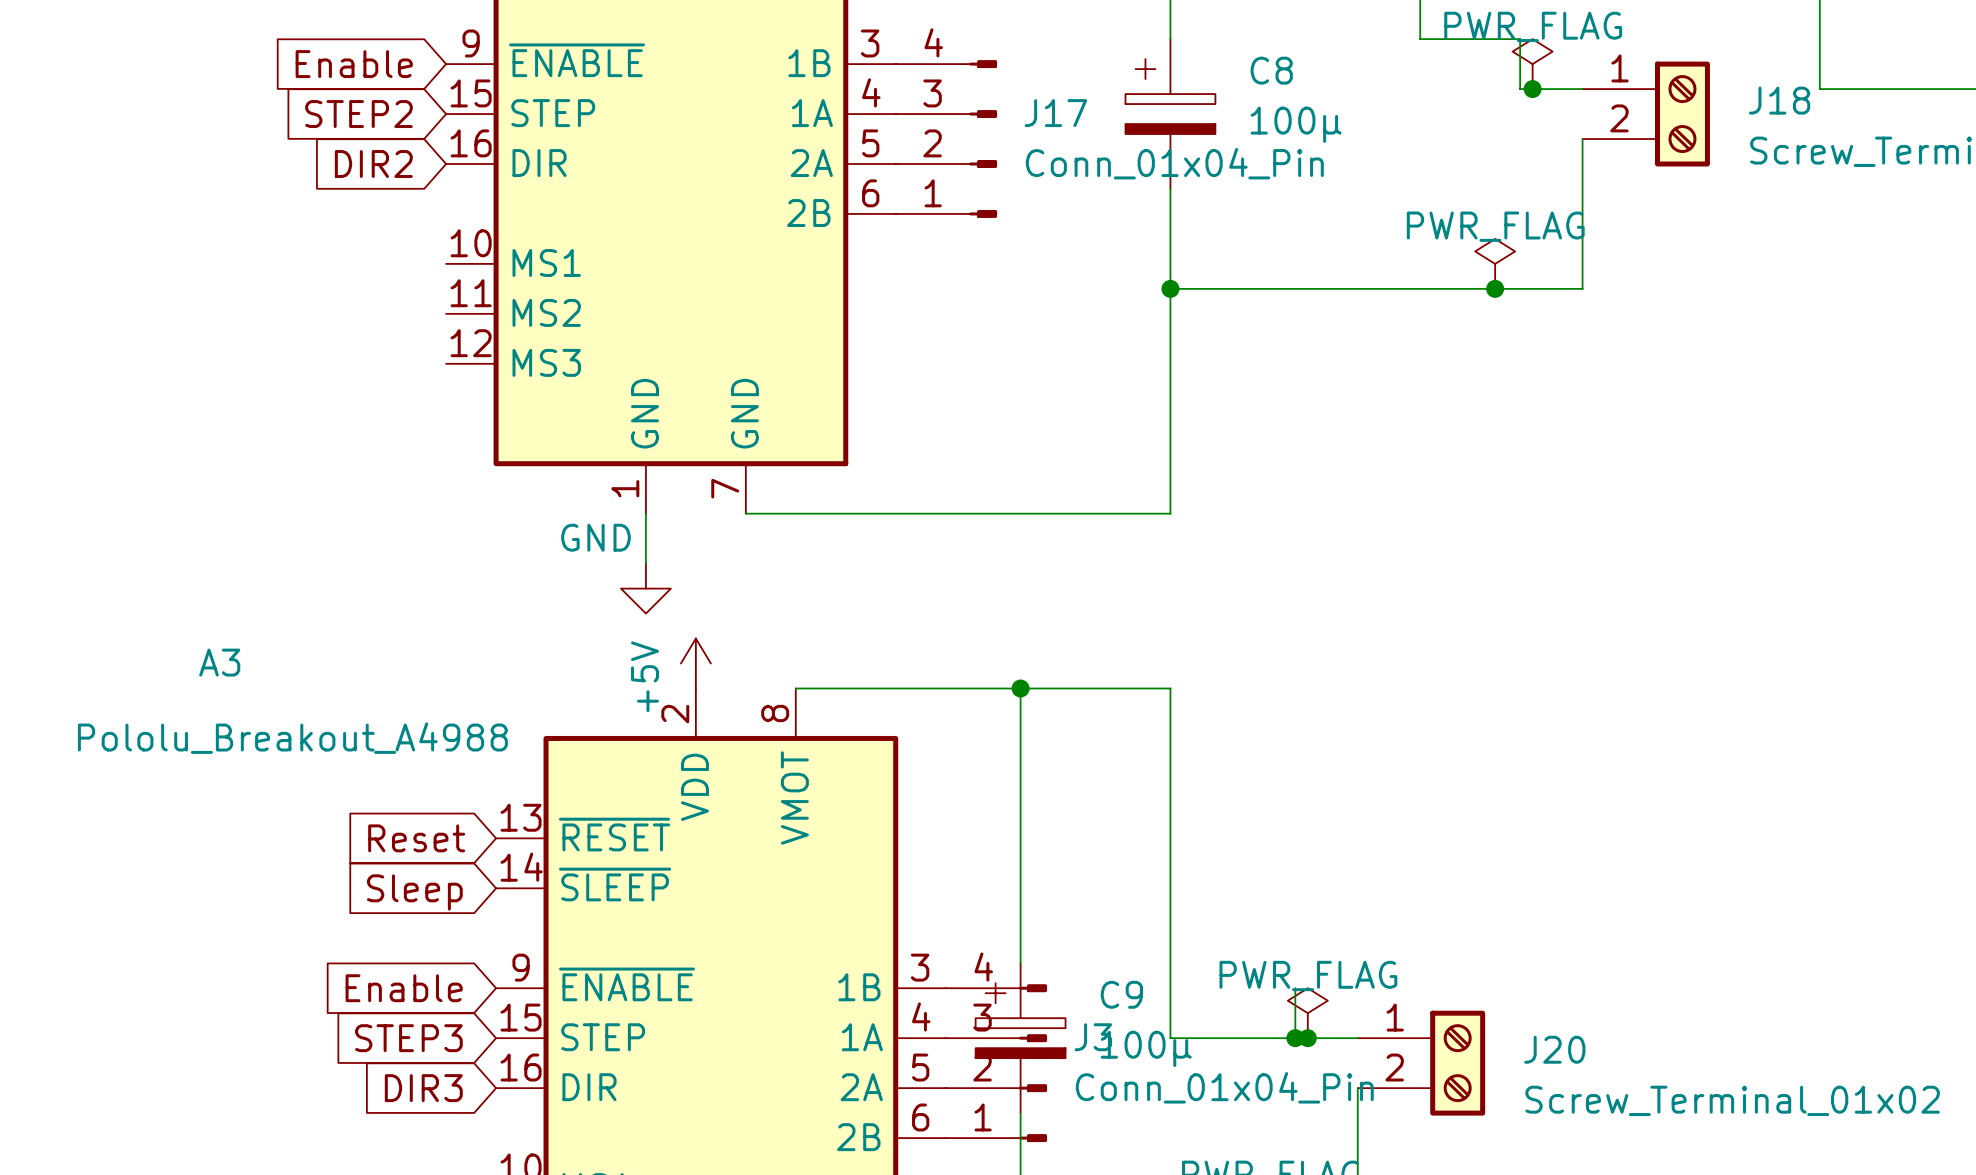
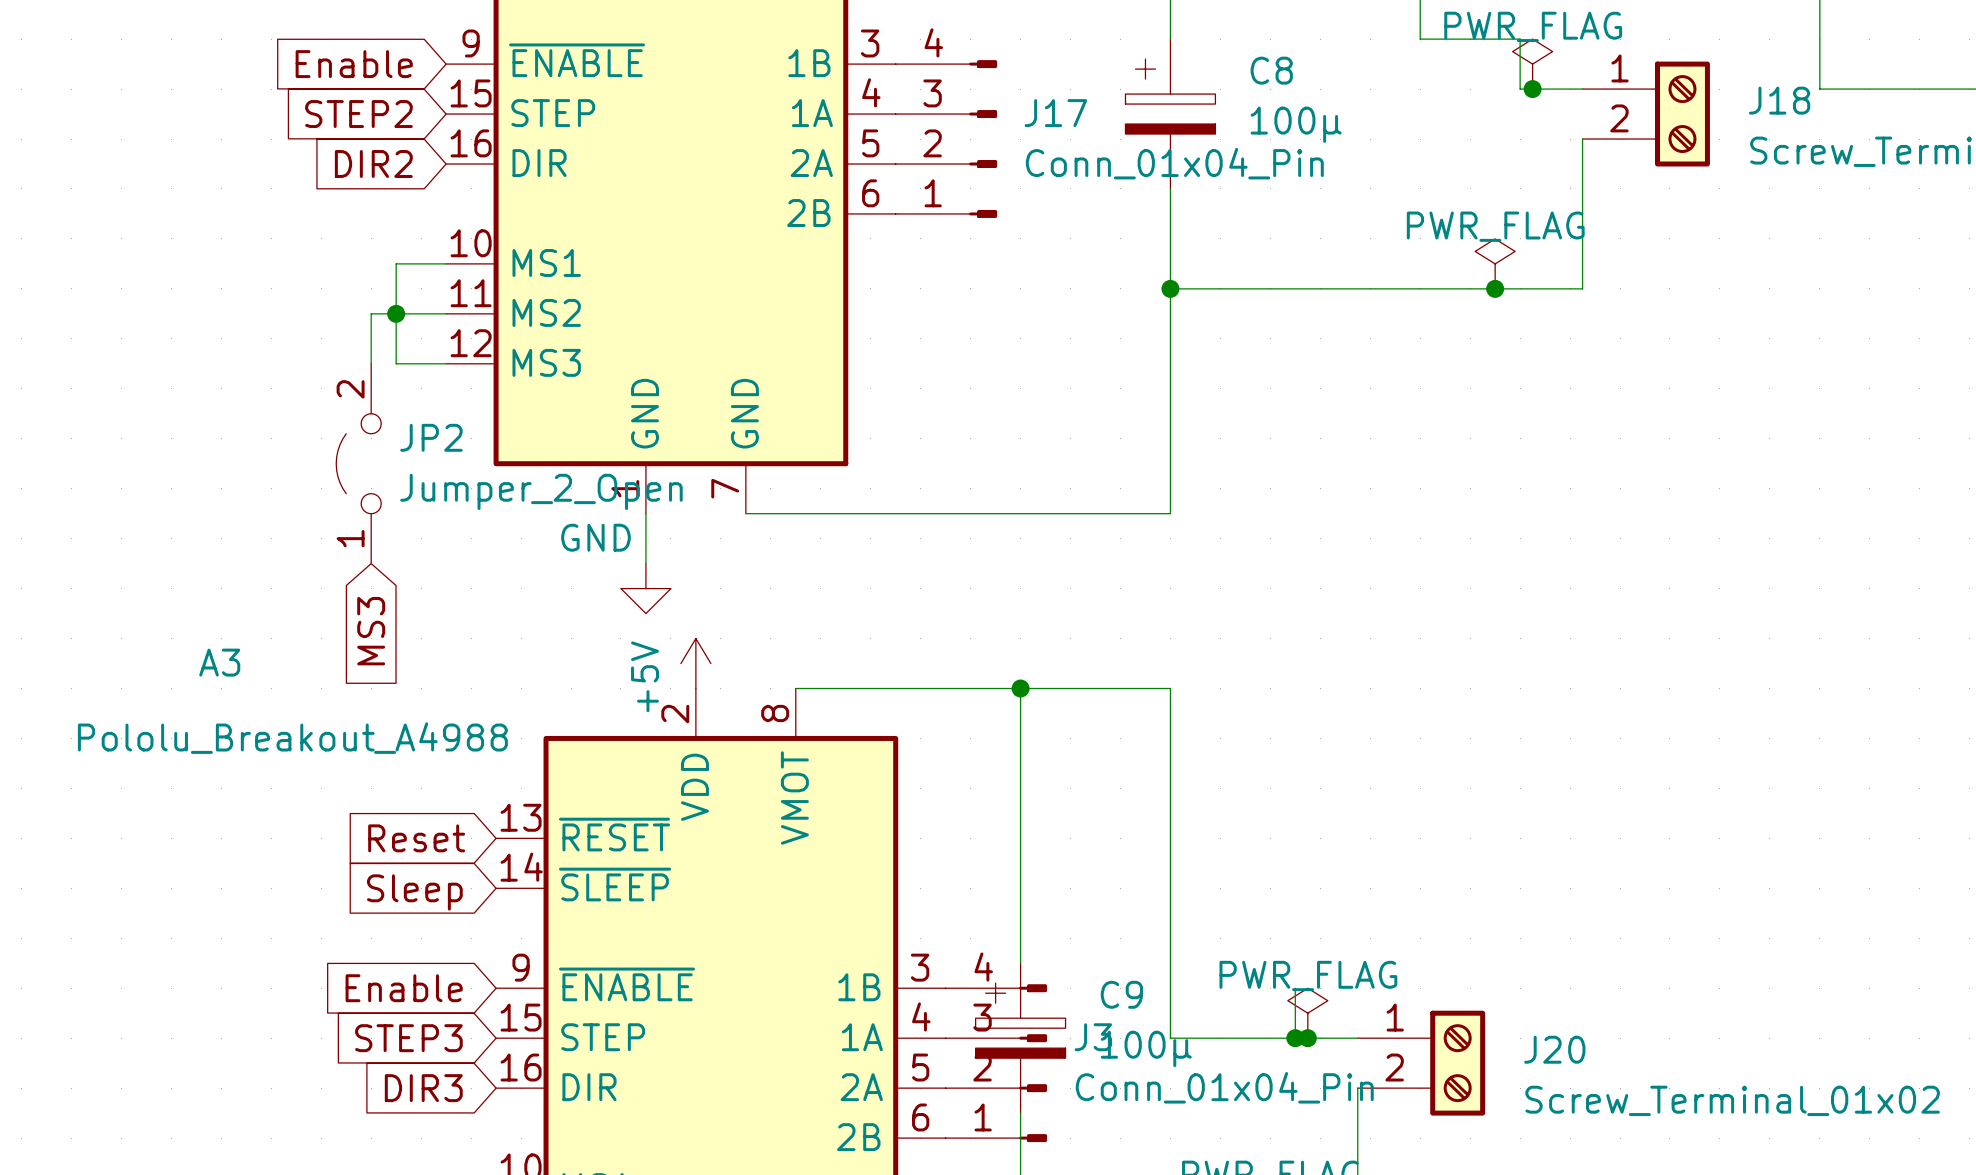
wire: none -> (446, 263) (396, 263) (396, 363) (446, 363)
junction: none -> (396, 313)
wire: none -> (446, 313) (371, 313) (371, 363)
JP2: none -> Jumper_2_Open (358, 463)
global label: none -> MS3 (371, 631)

